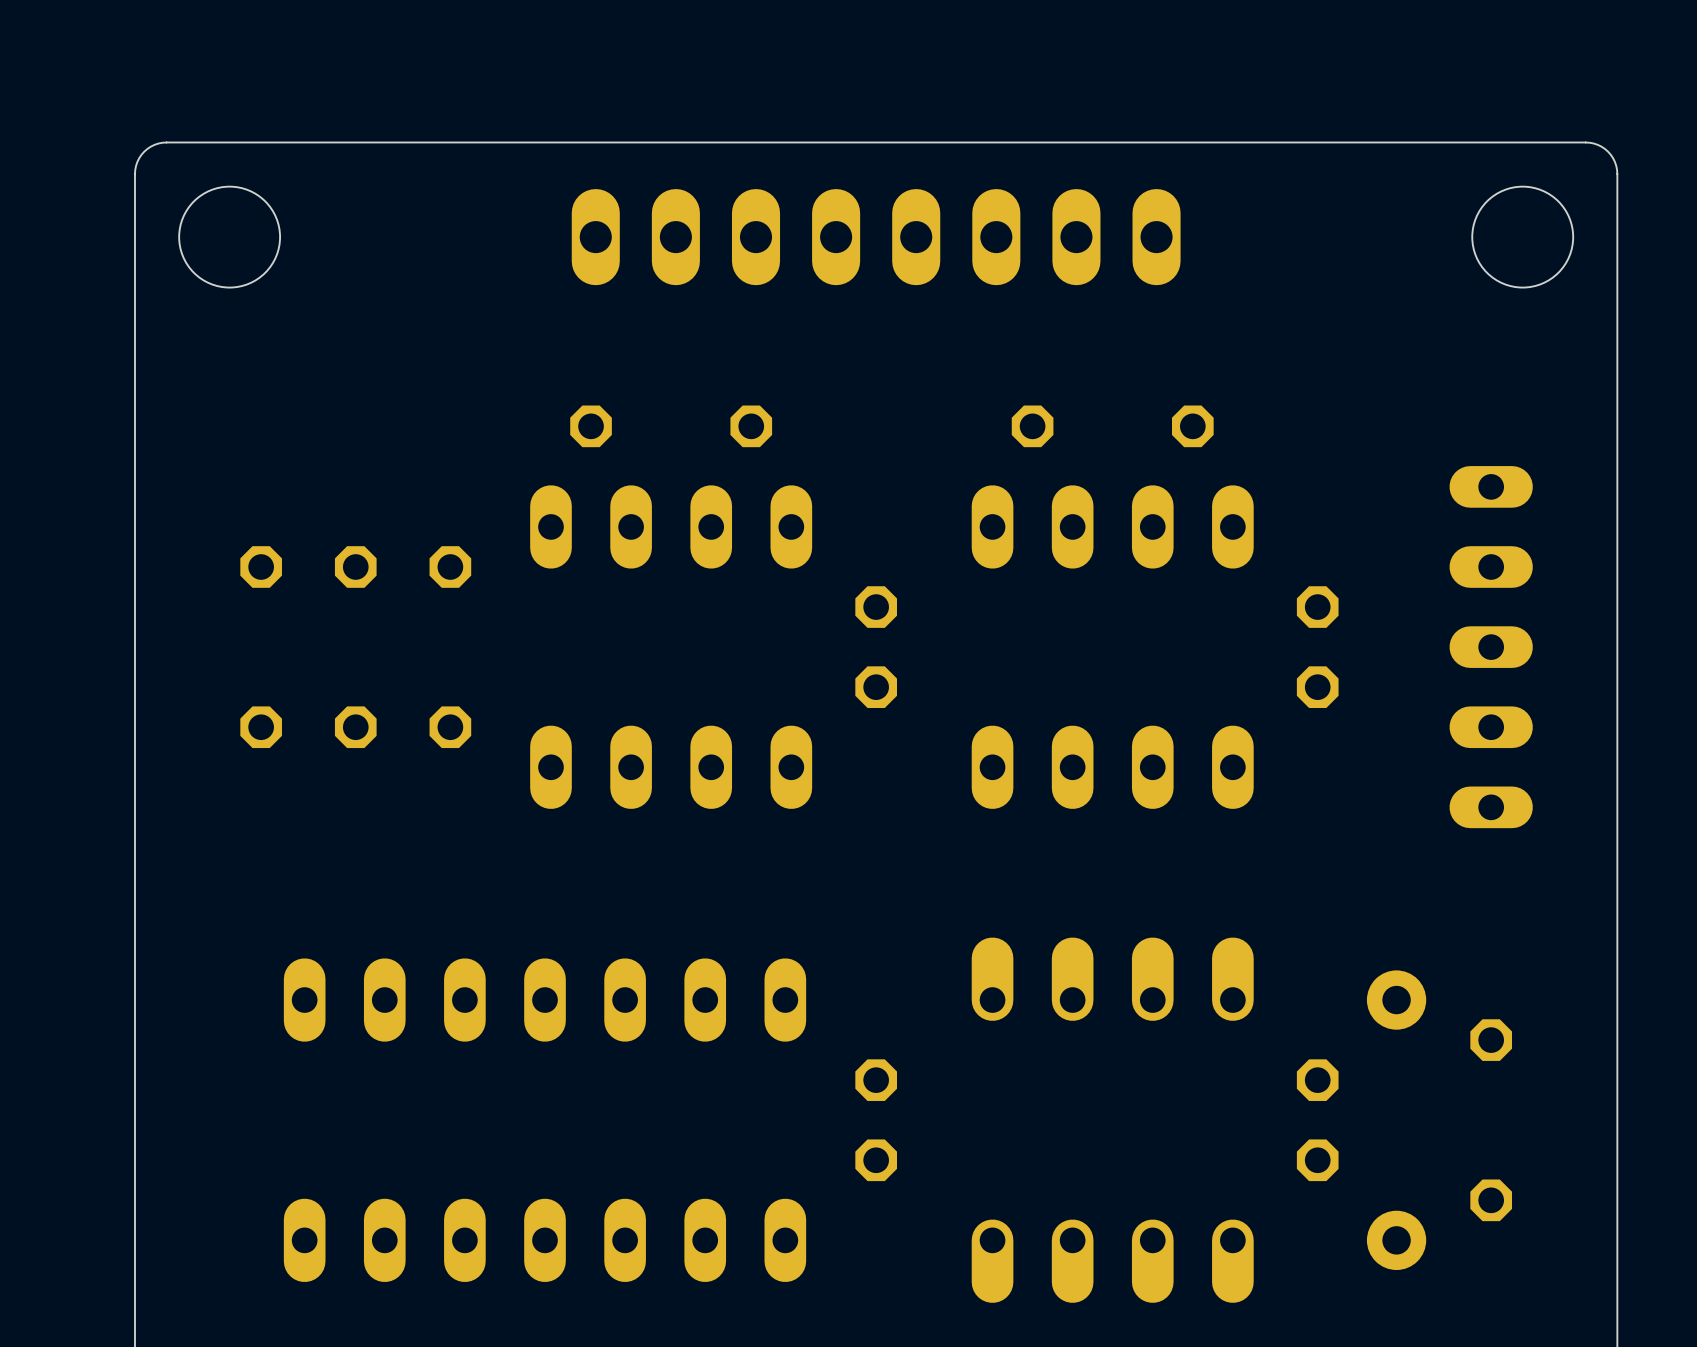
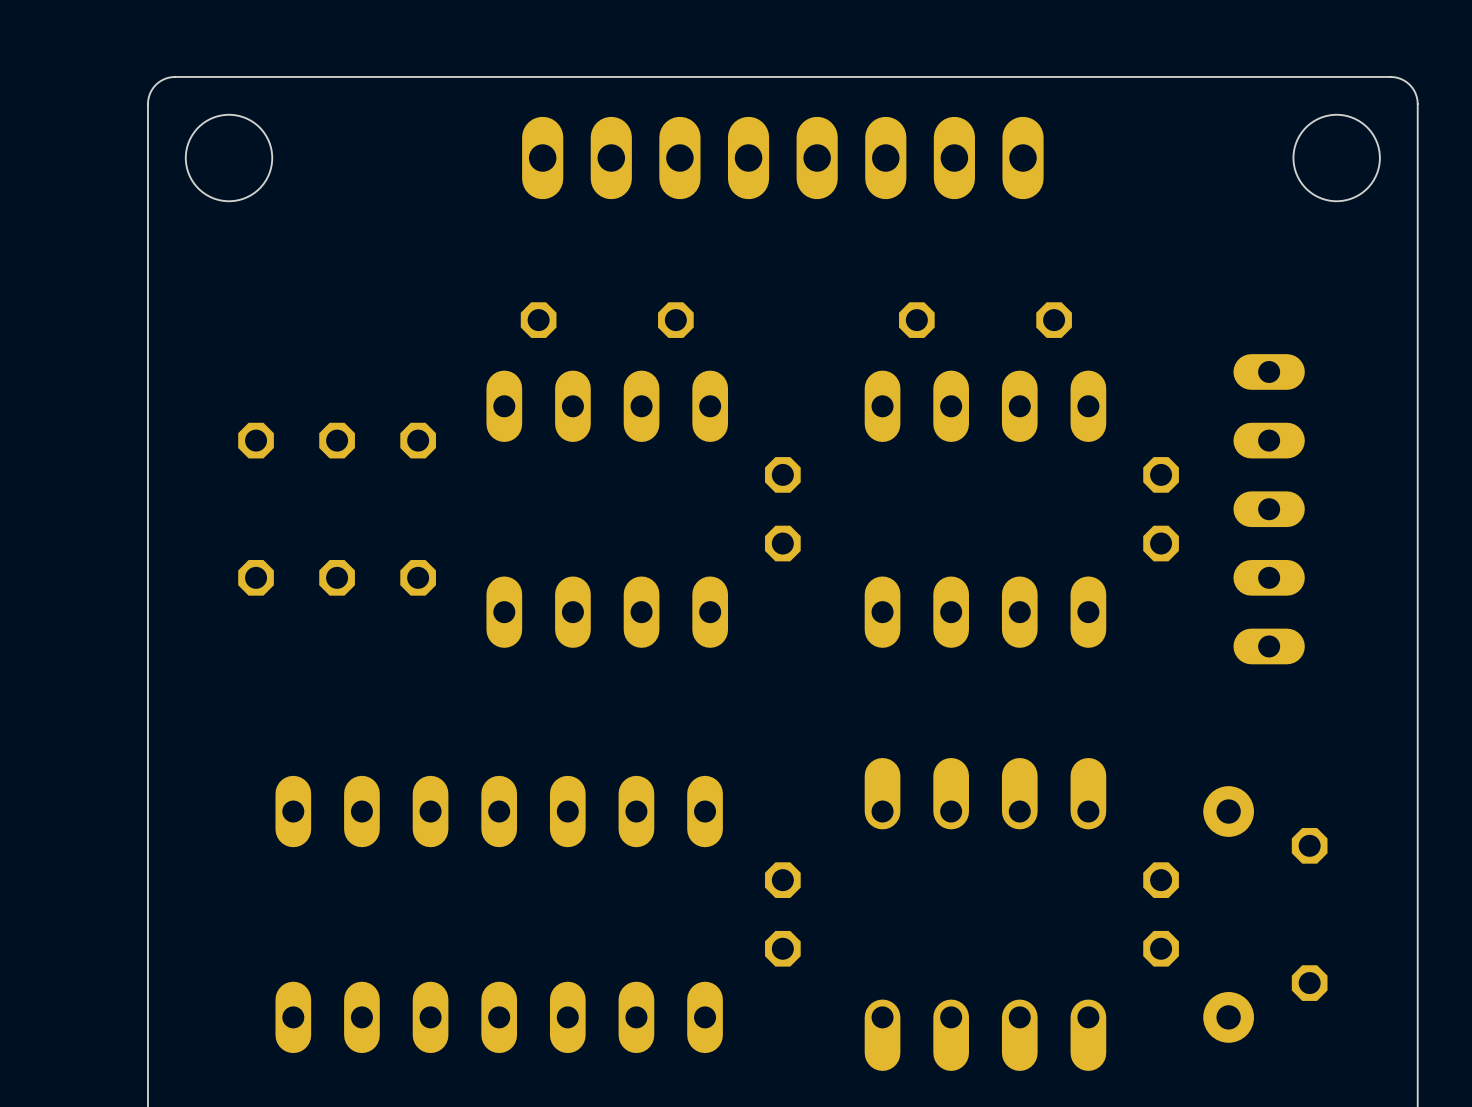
part position: (1491, 647) -> (1269, 509)

